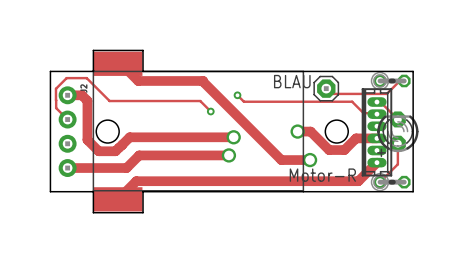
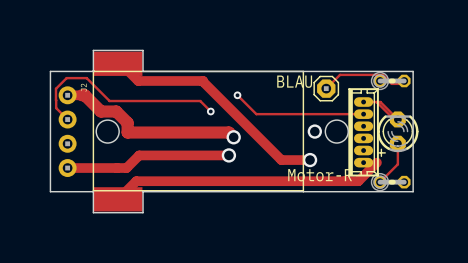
track: (404, 80) (399, 80) (386, 93) (331, 93) (326, 88) -> (403, 83) (391, 83) (382, 74) (340, 74) (326, 88)
track: (81, 95) (87, 100) (87, 139) (98, 151) (115, 151) (129, 137) (233, 137) -> (81, 95) (84, 95) (101, 111) (116, 111) (127, 122) (127, 132) (228, 132) (233, 137)
track: (243, 101) (352, 101) (363, 113) (376, 114) -> (243, 101) (256, 114) (363, 114)
track: none -> (363, 102) (376, 102) (394, 119)
track: (297, 131) (310, 131) (329, 150) (344, 150) (356, 138) (376, 138) -> none
via position: (297, 131) -> (314, 131)
part position: (376, 132) -> (363, 132)

